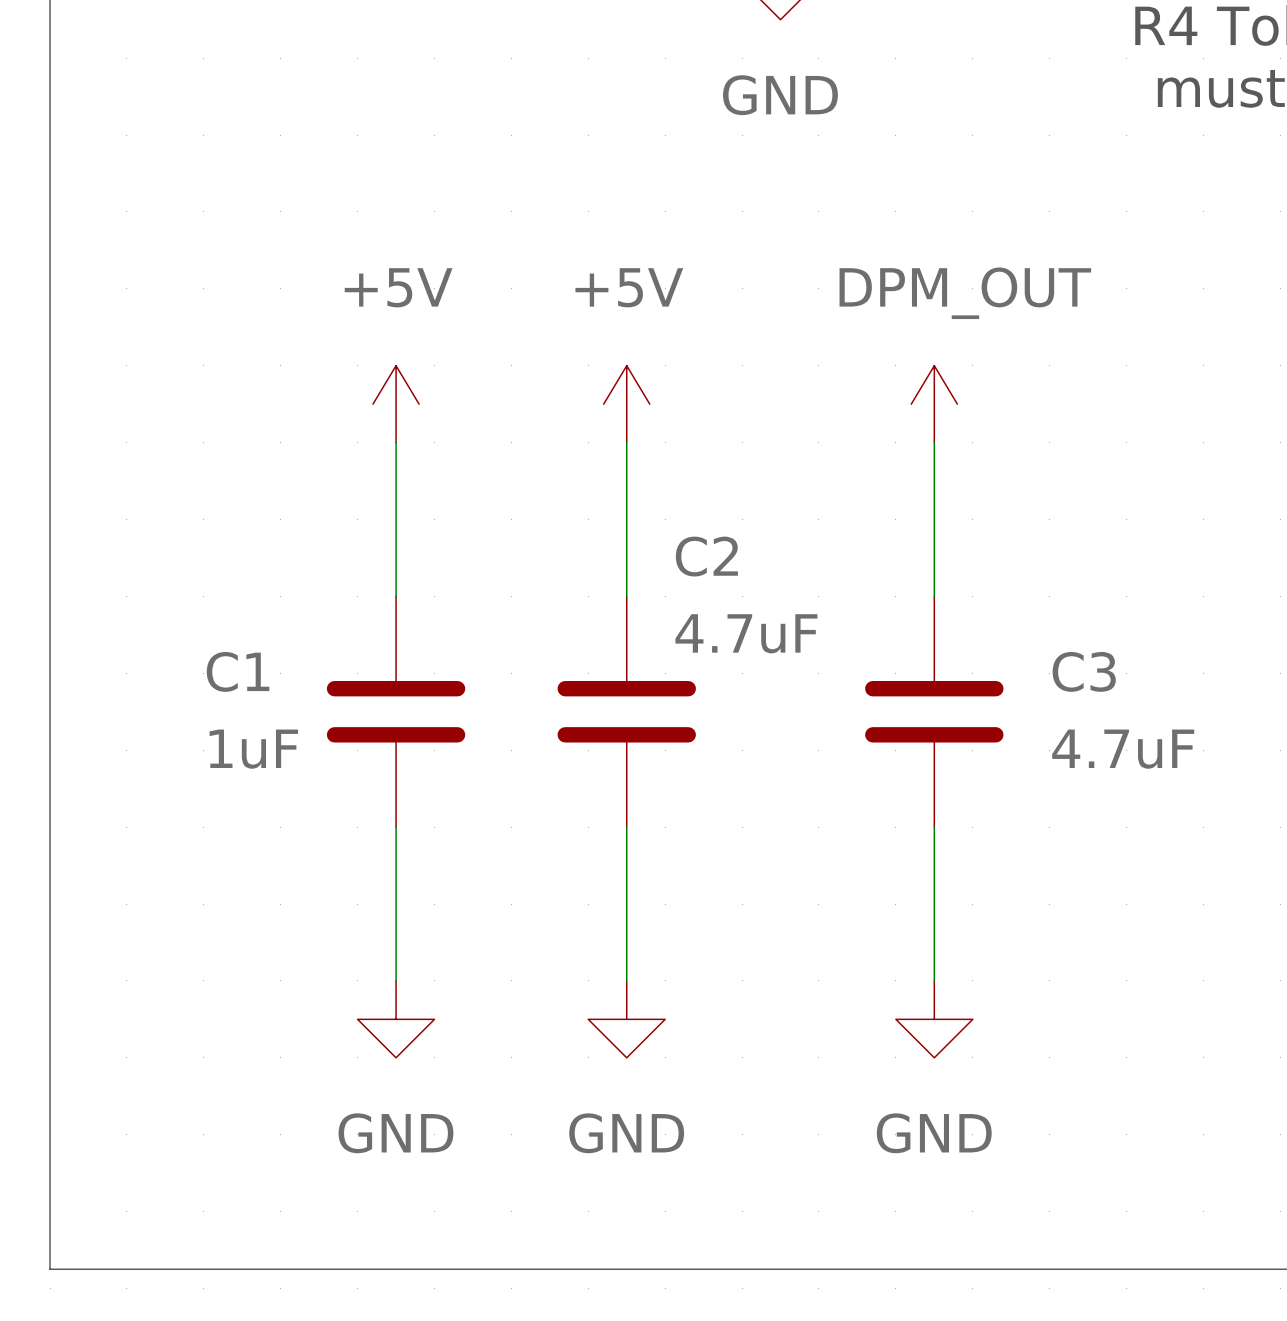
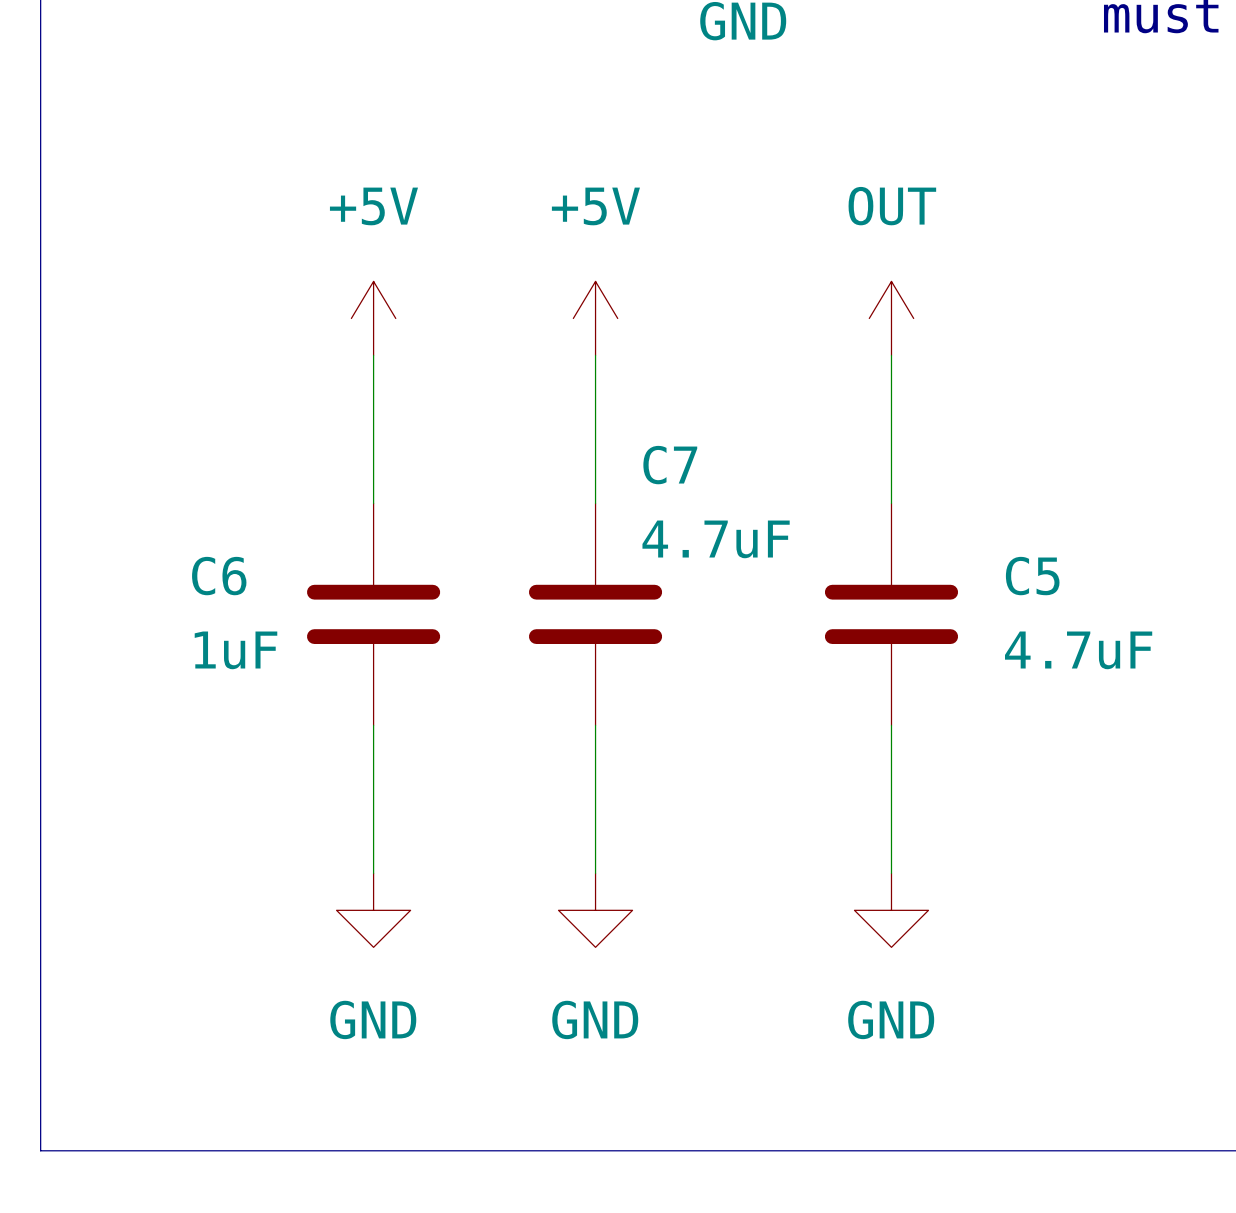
power symbol: DPM_OUT (934, 404) -> OUT (891, 318)
C2 name: C2 (706, 556) -> C7 (670, 465)
C1 name: C1 (238, 671) -> C6 (219, 576)
C3 name: C3 (1084, 671) -> C5 (1032, 576)

